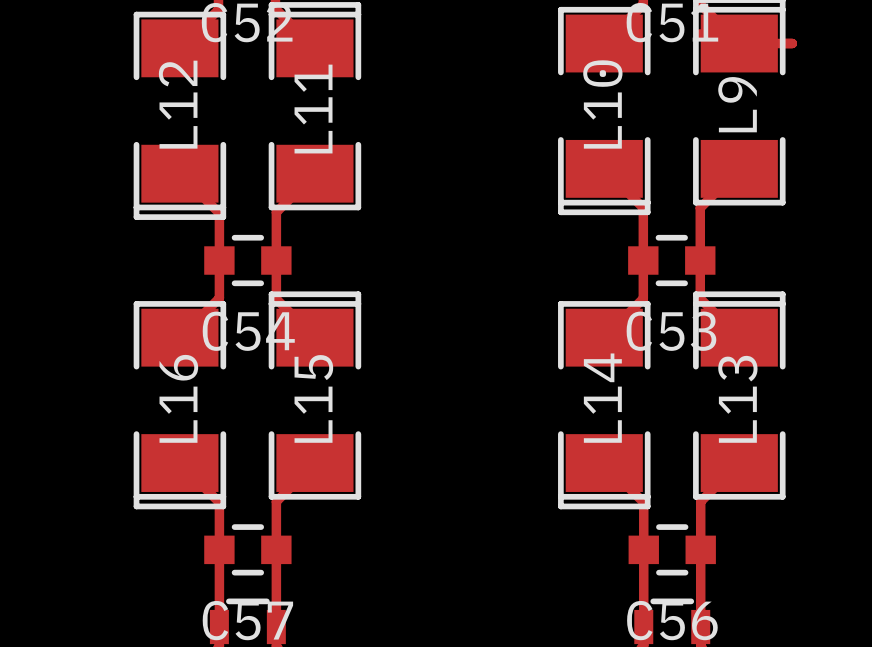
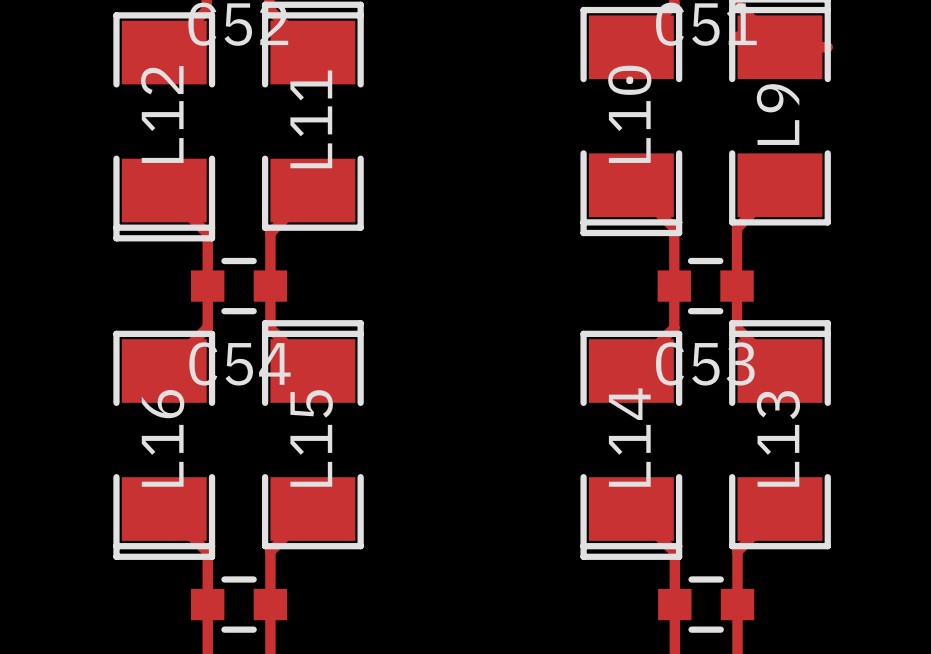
track: (782, 43) (792, 43) -> none

